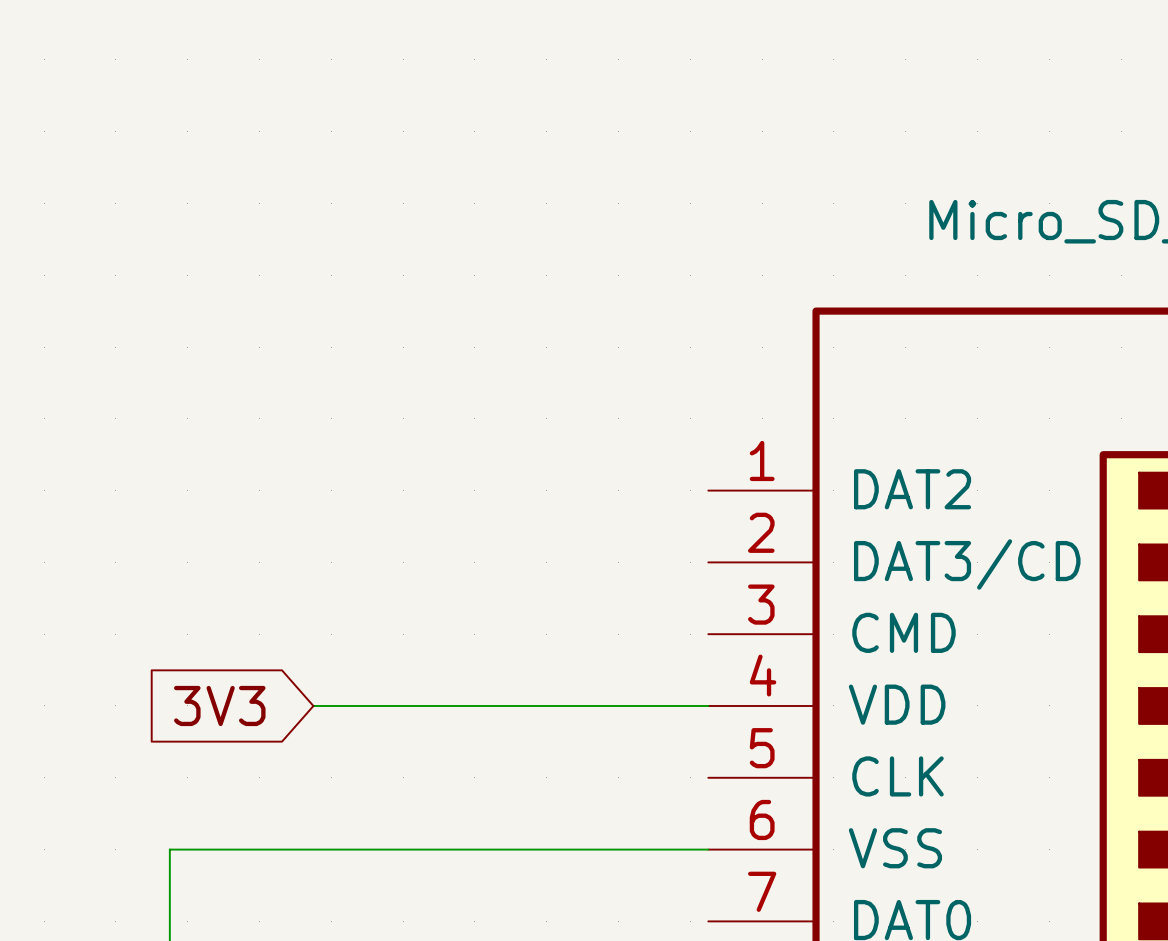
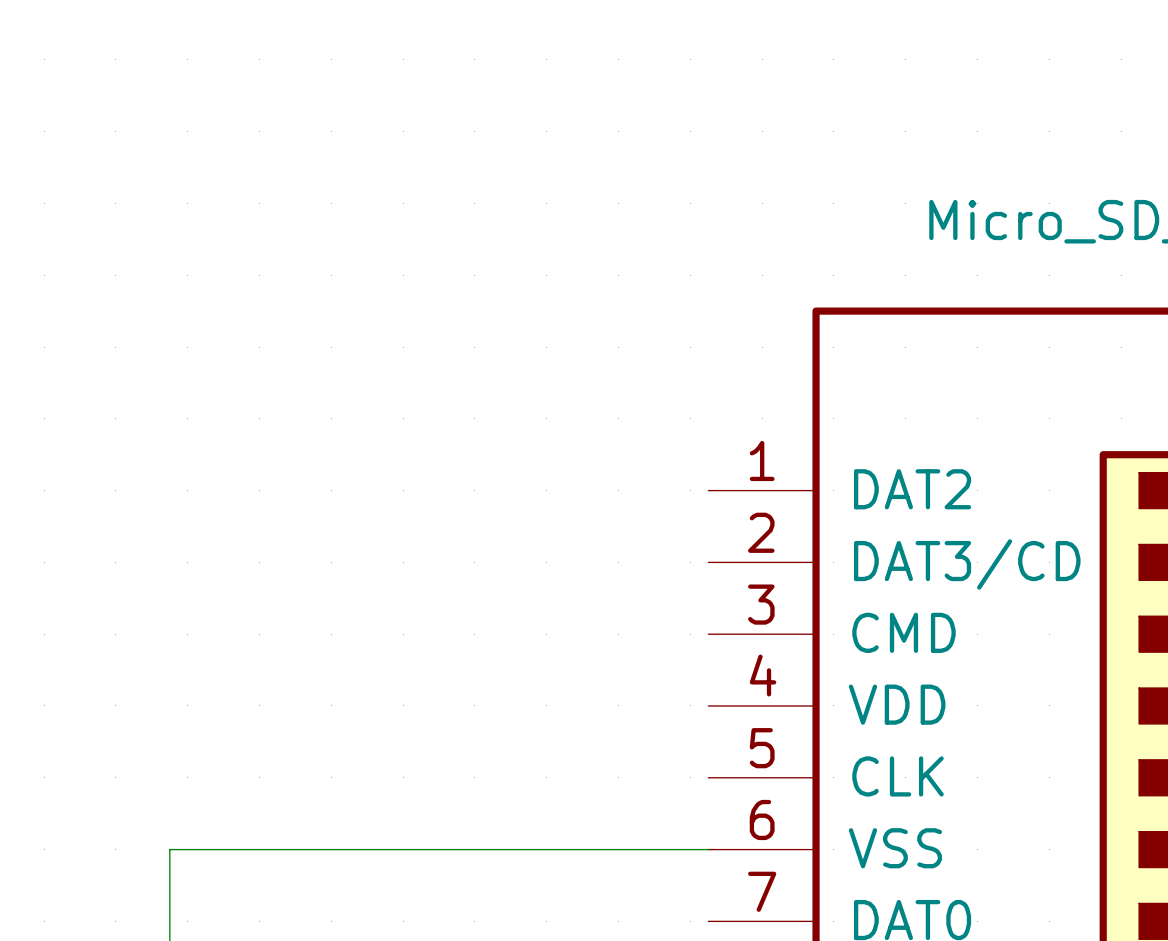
global label: 3V3 (219, 705) -> none
wire: (313, 705) (708, 705) -> none

